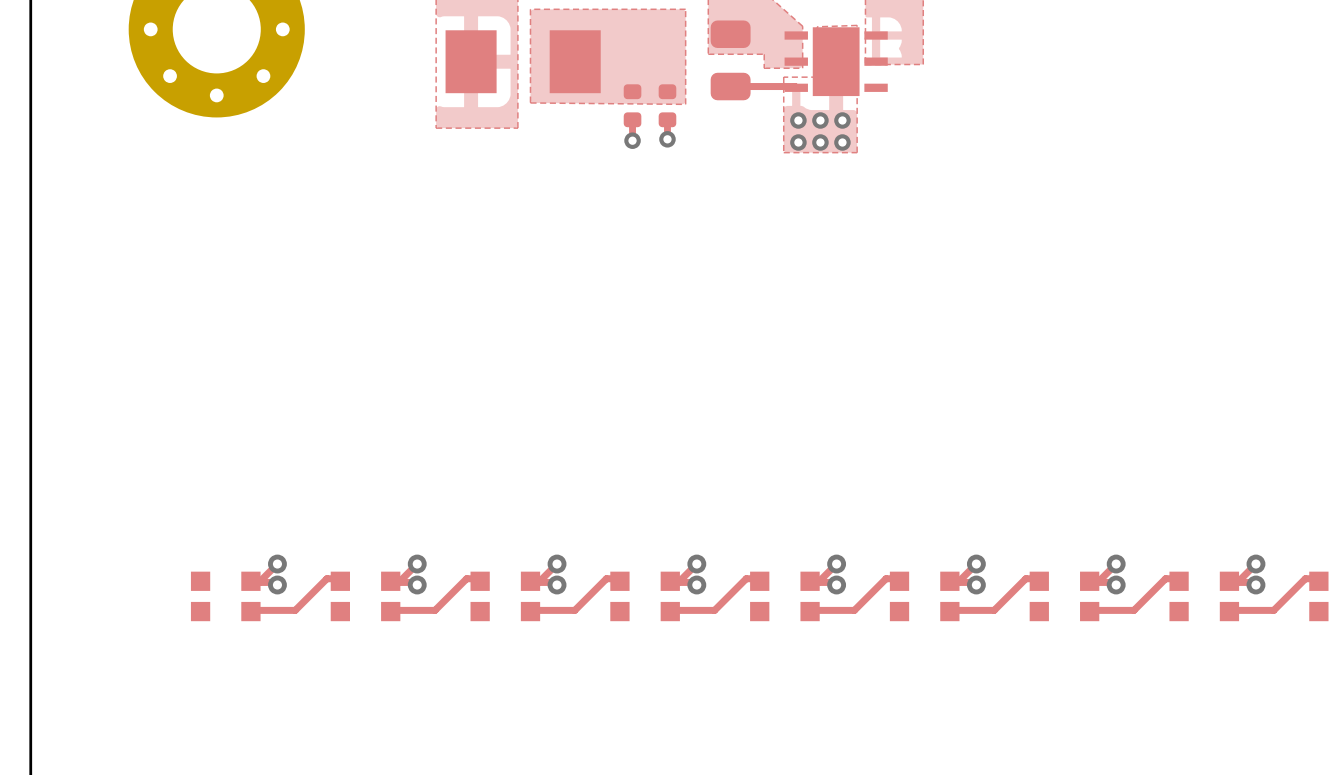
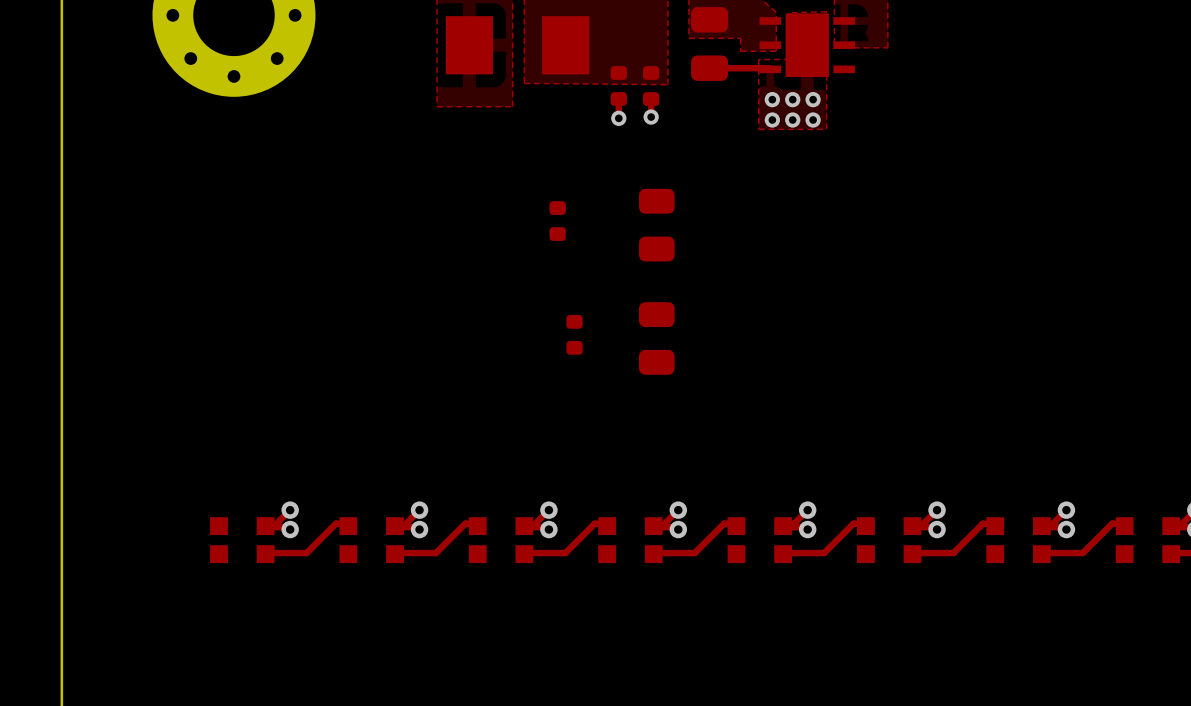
part: none -> (557, 221)
part: none -> (656, 225)
part: none -> (574, 334)
part: none -> (656, 338)

